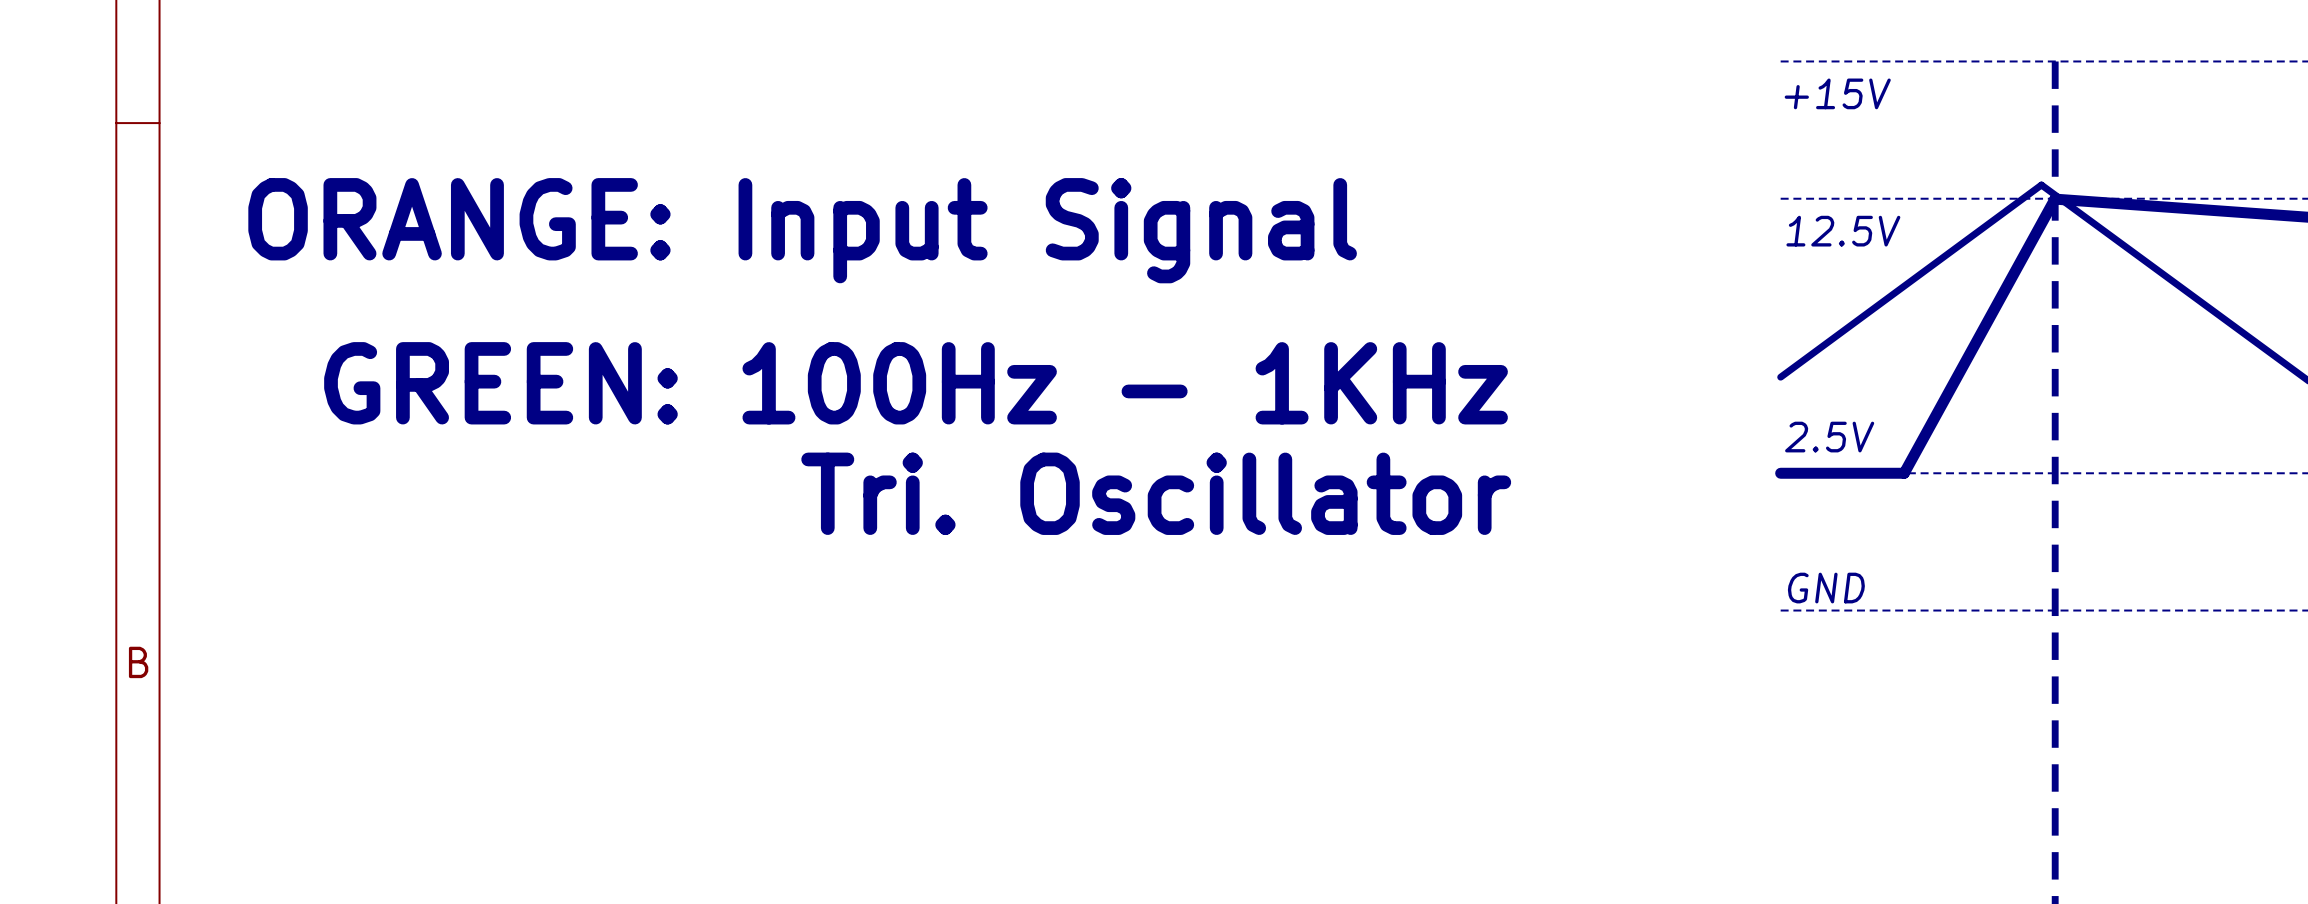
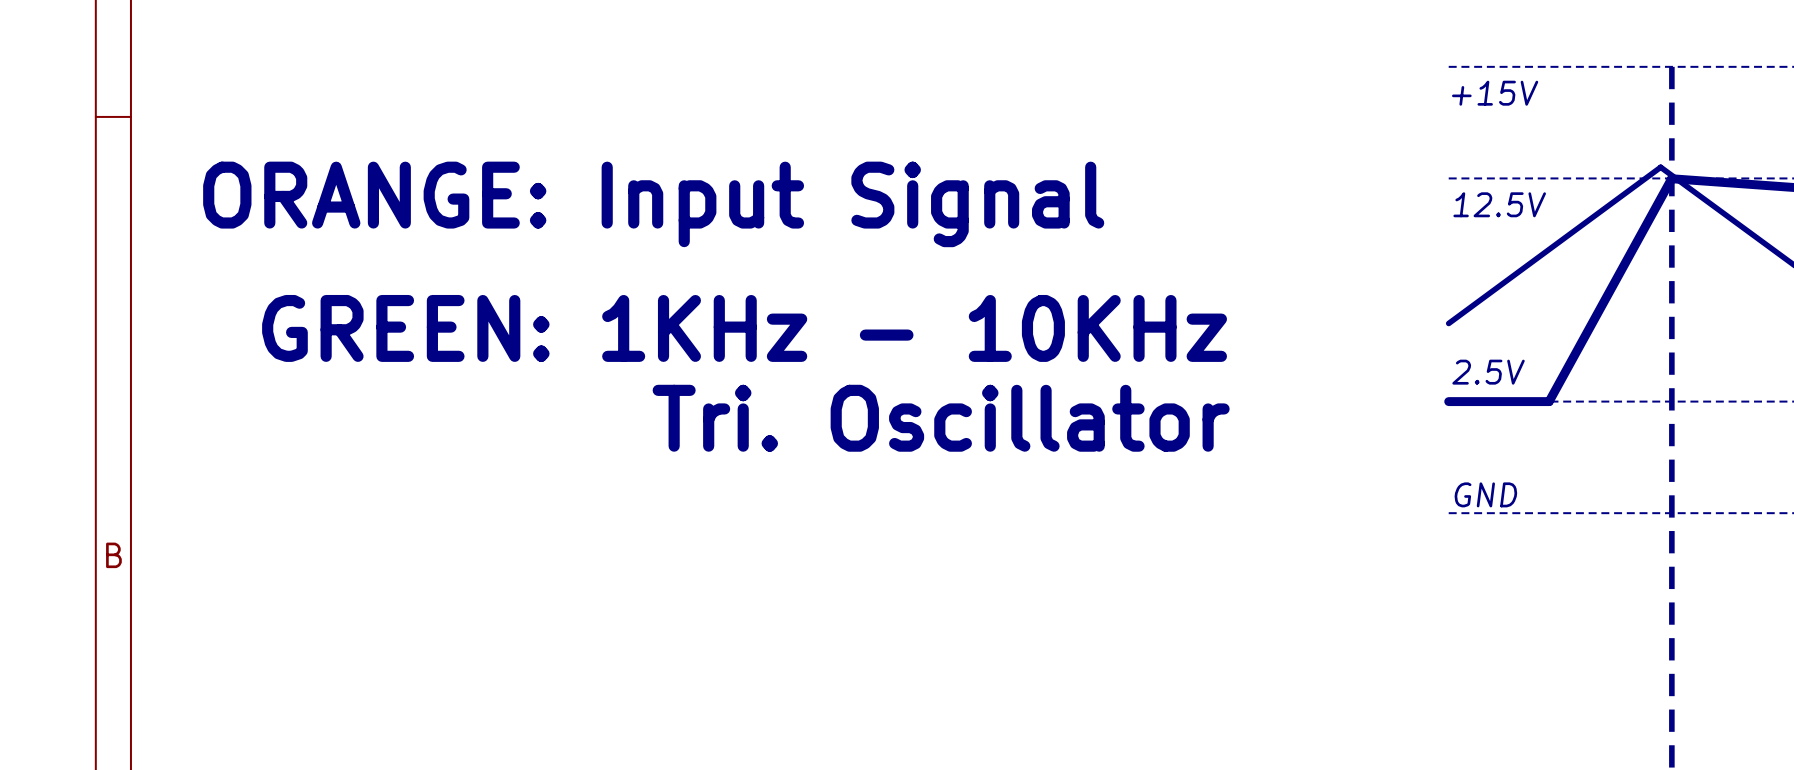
text: GREEN: 100Hz - 1KHz (916, 383) -> GREEN: 1KHz - 10KHz (744, 328)

